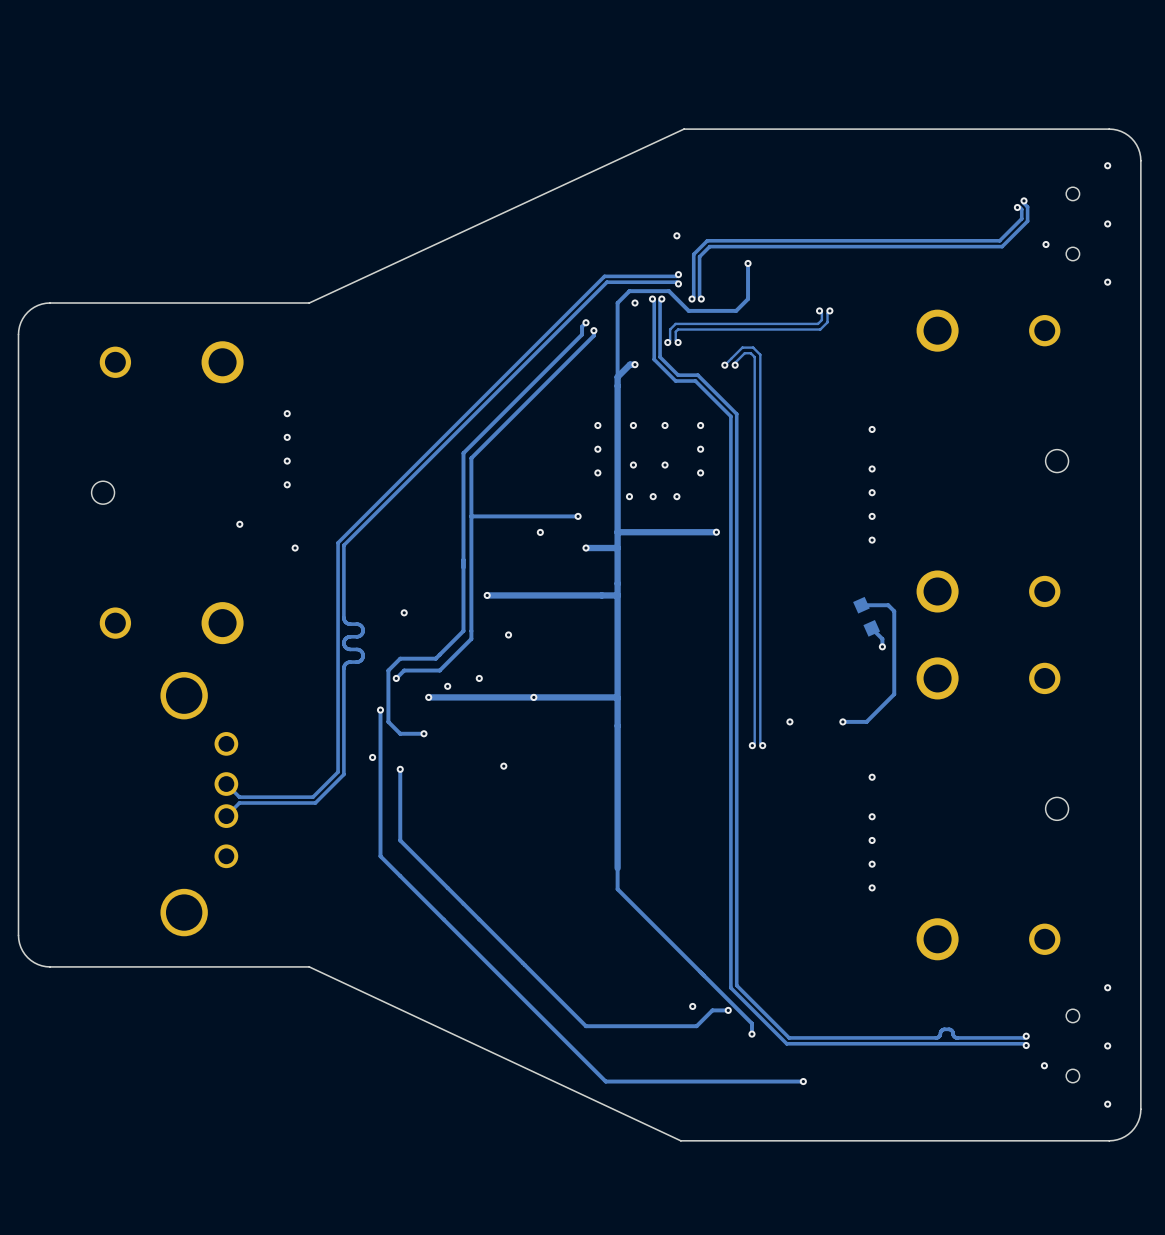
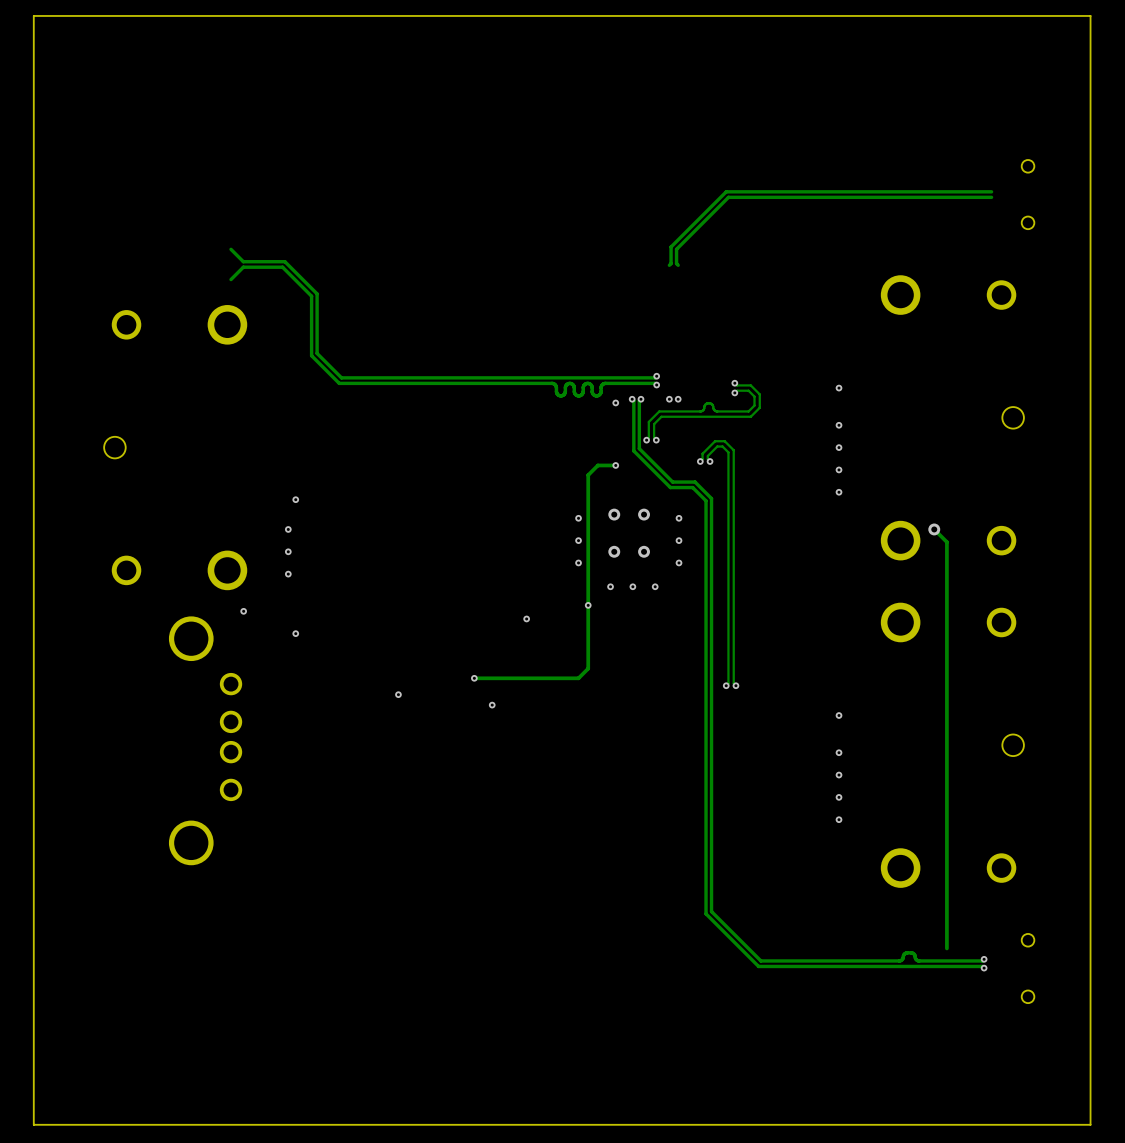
board edge: (1109, 129) (684, 129) (309, 303) (50, 303) (41, 304) (30, 309) (20, 322) (18, 334) (18, 935) (20, 947) (25, 954) (34, 962) (50, 966) (309, 966) (680, 1140) (1109, 1140) (1121, 1138) (1128, 1134) (1138, 1121) (1140, 1109) (1140, 160) (1138, 148) (1131, 138) (1121, 131) (1109, 129) -> (1090, 15) (1090, 1124) (33, 1124) (33, 15) (1090, 15)
via: (1107, 165) -> none
track: (1024, 200) (1027, 206) (1027, 221) (1002, 246) (709, 246) (699, 256) (699, 282) -> (991, 197) (728, 197) (676, 249)
via: (1024, 200) -> none
track: (1017, 207) (1021, 209) (1021, 218) (999, 240) (707, 240) (693, 254) (693, 279) -> (991, 191) (726, 191) (671, 247)
via: (1017, 207) -> none
via: (1107, 223) -> none
via: (676, 235) -> none
via: (1046, 244) -> none
track: (748, 263) (748, 299) (736, 310) (688, 310) (668, 291) (629, 291) (617, 303) (617, 385) -> none
via: (748, 263) -> none
track: (678, 274) (676, 276) (604, 276) (338, 542) (338, 772) (312, 797) (239, 797) (226, 784) -> none
via: (678, 274) -> none
track: none -> (231, 249) (243, 261) (284, 261) (317, 293) (317, 353) (341, 377) (655, 377) (656, 376)
via: (1107, 282) -> none
track: (678, 283) (676, 282) (606, 282) (343, 545) (344, 619) (347, 623) (359, 624) (363, 630) (359, 636) (347, 637) (344, 641) (346, 648) (359, 650) (363, 655) (359, 661) (347, 662) (344, 667) (343, 774) (315, 803) (239, 803) (226, 816) -> none
via: (678, 283) -> none
track: (652, 299) (654, 300) (654, 359) (675, 381) (695, 381) (730, 416) (730, 549) -> (632, 399) (633, 400) (633, 450) (670, 487) (692, 487) (706, 500)
via: (652, 299) -> none
track: (661, 299) (660, 300) (660, 357) (678, 375) (697, 375) (736, 414) (736, 546) -> (640, 399) (639, 400) (639, 448) (672, 482) (695, 482) (711, 498)
via: (661, 299) -> none
via: (691, 299) -> none
via: (701, 299) -> none
via: (635, 303) -> none
track: (819, 310) (821, 313) (821, 320) (818, 323) (675, 323) (670, 329) (670, 340) (667, 342) -> none
via: (819, 310) -> none
track: (829, 310) (827, 313) (827, 322) (820, 329) (678, 329) (675, 331) (675, 340) (678, 342) -> none
via: (829, 310) -> none
track: none -> (231, 279) (243, 267) (282, 267) (311, 296) (311, 355) (339, 383) (551, 383) (555, 385) (556, 393) (560, 395) (564, 394) (565, 385) (568, 383) (573, 385) (574, 393) (578, 395) (582, 394) (583, 385) (586, 383) (591, 385) (592, 393) (596, 395) (600, 394) (601, 385) (604, 383) (655, 383) (656, 385)
track: (586, 322) (582, 326) (582, 334) (463, 453) (463, 631) (435, 658) (400, 658) (388, 670) (388, 721) (400, 733) (423, 733) -> none
via: (586, 322) -> none
track: (593, 330) (593, 335) (471, 458) (471, 638) (439, 670) (404, 670) (396, 678) -> none
via: (593, 330) -> none
via: (667, 342) -> none
via: (678, 342) -> none
track: (635, 364) (629, 364) (617, 377) (617, 889) (751, 1023) (751, 1034) -> none
via: (635, 364) -> none
track: (724, 365) (742, 347) (753, 347) (760, 354) (760, 495) -> (700, 461) (702, 459) (702, 453) (715, 441) (724, 441) (733, 450)
via: (724, 365) -> none
track: (735, 365) (744, 353) (750, 353) (754, 357) (754, 497) -> (710, 461) (707, 456) (717, 446) (722, 446) (728, 452)
via: (735, 365) -> none
via: (287, 413) -> none
via: none -> (656, 376)
track: none -> (734, 383) (737, 385) (750, 385) (759, 394) (759, 407) (750, 416) (661, 416) (654, 424) (654, 437) (656, 440)
via: none -> (734, 383)
via: (597, 425) -> none
via: (633, 425) -> none
via: (665, 425) -> none
via: (700, 425) -> none
via: none -> (656, 385)
track: none -> (734, 392) (737, 390) (748, 390) (754, 396) (754, 405) (748, 411) (716, 411) (709, 403) (705, 404) (701, 411) (659, 411) (648, 421) (648, 437) (646, 440)
via: none -> (734, 392)
via: (287, 437) -> none
via: none -> (632, 399)
via: none -> (640, 399)
via: none -> (669, 399)
via: none -> (678, 399)
via: none -> (615, 402)
via: (597, 449) -> none
via: (700, 449) -> none
via: (287, 461) -> none
via: (633, 465) -> none
via: (665, 465) -> none
via: (597, 472) -> none
via: (700, 472) -> none
via: (287, 484) -> none
via: none -> (646, 440)
via: none -> (656, 440)
via: (629, 496) -> none
via: (653, 496) -> none
via: (676, 496) -> none
via: none -> (700, 461)
via: none -> (710, 461)
track: none -> (615, 465) (597, 465) (588, 475) (588, 668) (578, 678) (474, 678)
via: none -> (615, 465)
track: (578, 516) (471, 516) -> none
via: (578, 516) -> none
via: (239, 524) -> none
via: (540, 532) -> none
track: (716, 532) (617, 532) -> none
via: (716, 532) -> none
via position: (586, 548) -> (578, 518)
track: (617, 548) (586, 548) -> none
via: none -> (614, 514)
via: none -> (644, 514)
via: none -> (679, 518)
via: none -> (288, 529)
track: none -> (934, 529) (946, 542) (946, 948)
via: none -> (934, 529)
via: none -> (578, 540)
via: none -> (679, 540)
via: (487, 595) -> none
track: (617, 595) (487, 595) -> none
via: none -> (288, 551)
via: none -> (614, 551)
via: none -> (644, 551)
track: (861, 605) (888, 605) (894, 611) (894, 694) (866, 721) (842, 721) -> none
via: (404, 612) -> none
via: none -> (578, 562)
via: none -> (679, 562)
part: (866, 616) -> none
via: none -> (288, 574)
track: (871, 628) (882, 639) (882, 646) -> none
via: (508, 634) -> none
via: none -> (610, 586)
via: none -> (632, 586)
via: none -> (655, 586)
via: (882, 646) -> none
via: none -> (588, 605)
via: none -> (243, 611)
via: (396, 678) -> none
via: (479, 678) -> none
via: (447, 686) -> none
via: none -> (295, 633)
track: (428, 697) (617, 698) -> none
via: (428, 697) -> none
via position: (533, 697) -> (526, 618)
track: (380, 710) (380, 856) (605, 1081) (803, 1081) -> none
via: (380, 710) -> none
via: (789, 721) -> none
via: (842, 721) -> none
via: (423, 733) -> none
via: none -> (474, 678)
via: none -> (398, 694)
via: (372, 757) -> none
track: (400, 769) (400, 840) (586, 1026) (696, 1026) (712, 1010) (728, 1010) -> none
via: (400, 769) -> none
via: (1107, 987) -> none
via: (692, 1006) -> none
via: (728, 1010) -> none
via: (751, 1034) -> none
via: (1107, 1045) -> none
via: (1044, 1065) -> none
via: (803, 1081) -> none
via: (1107, 1104) -> none

